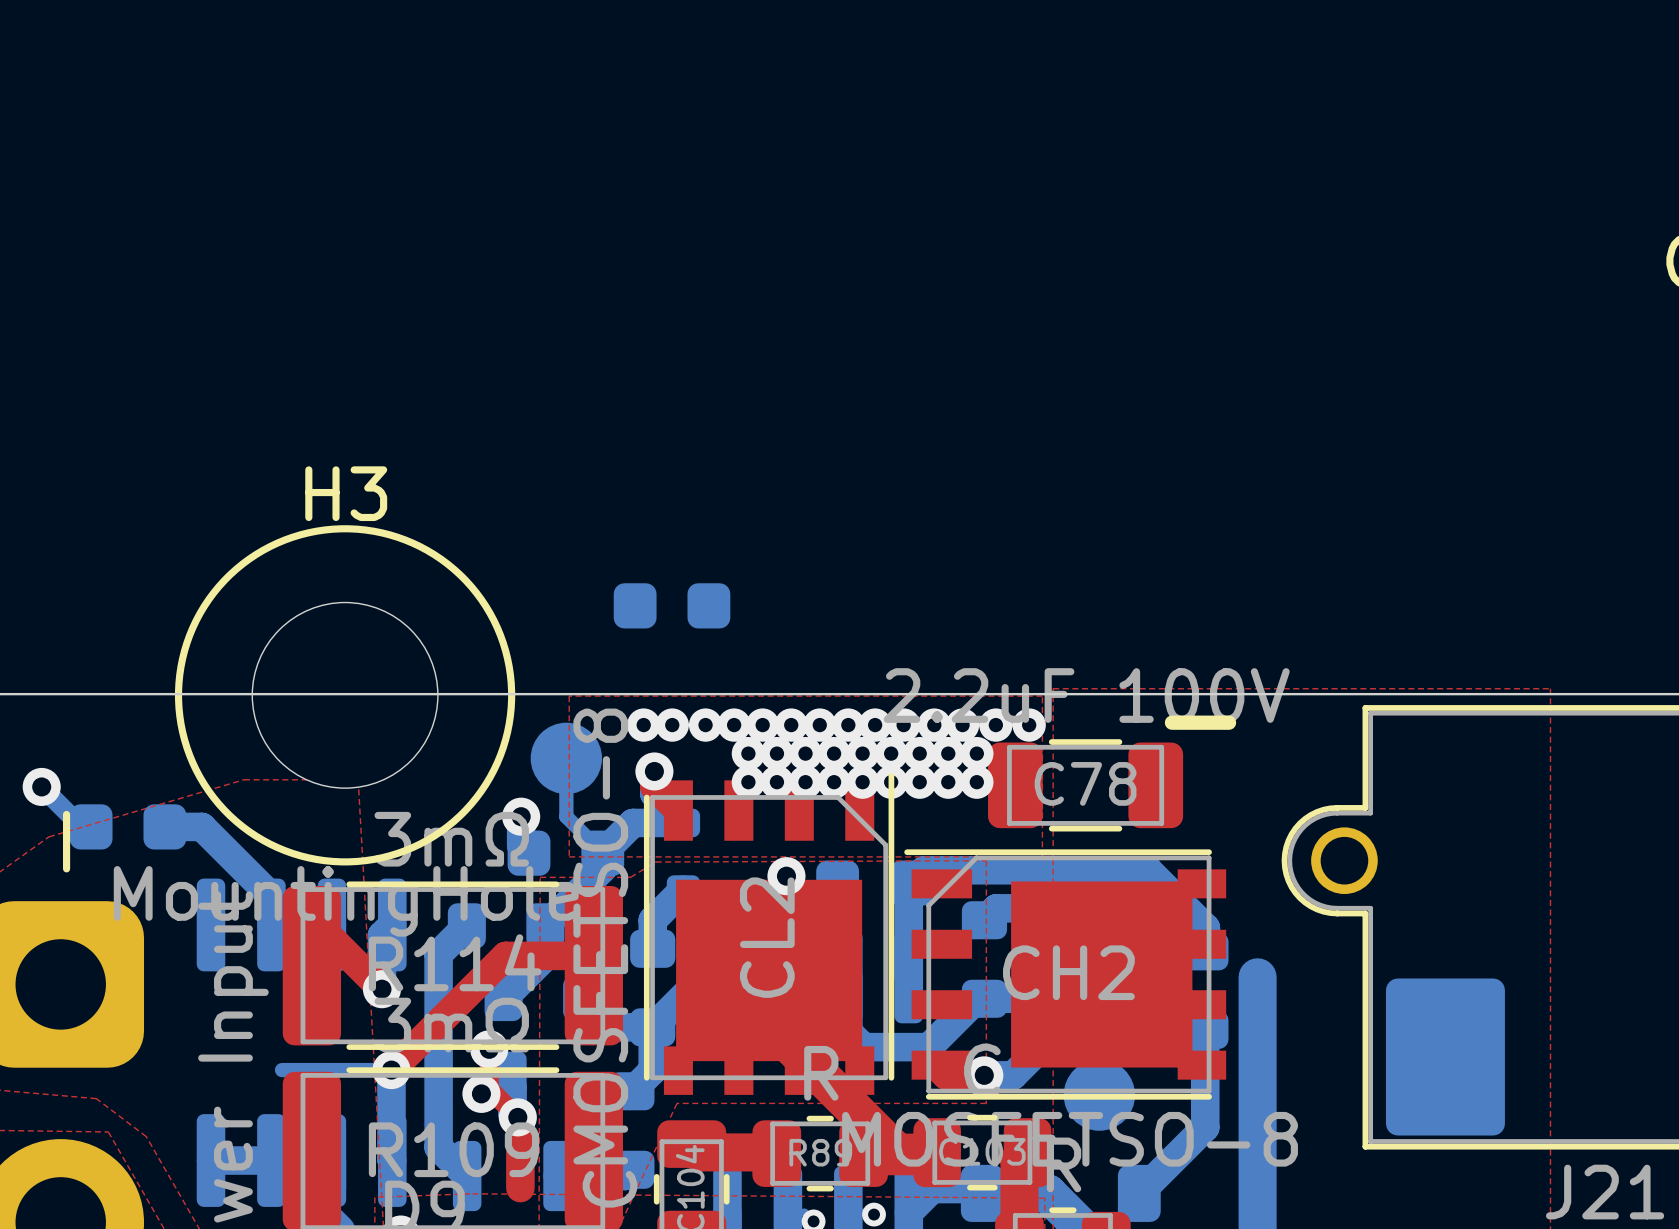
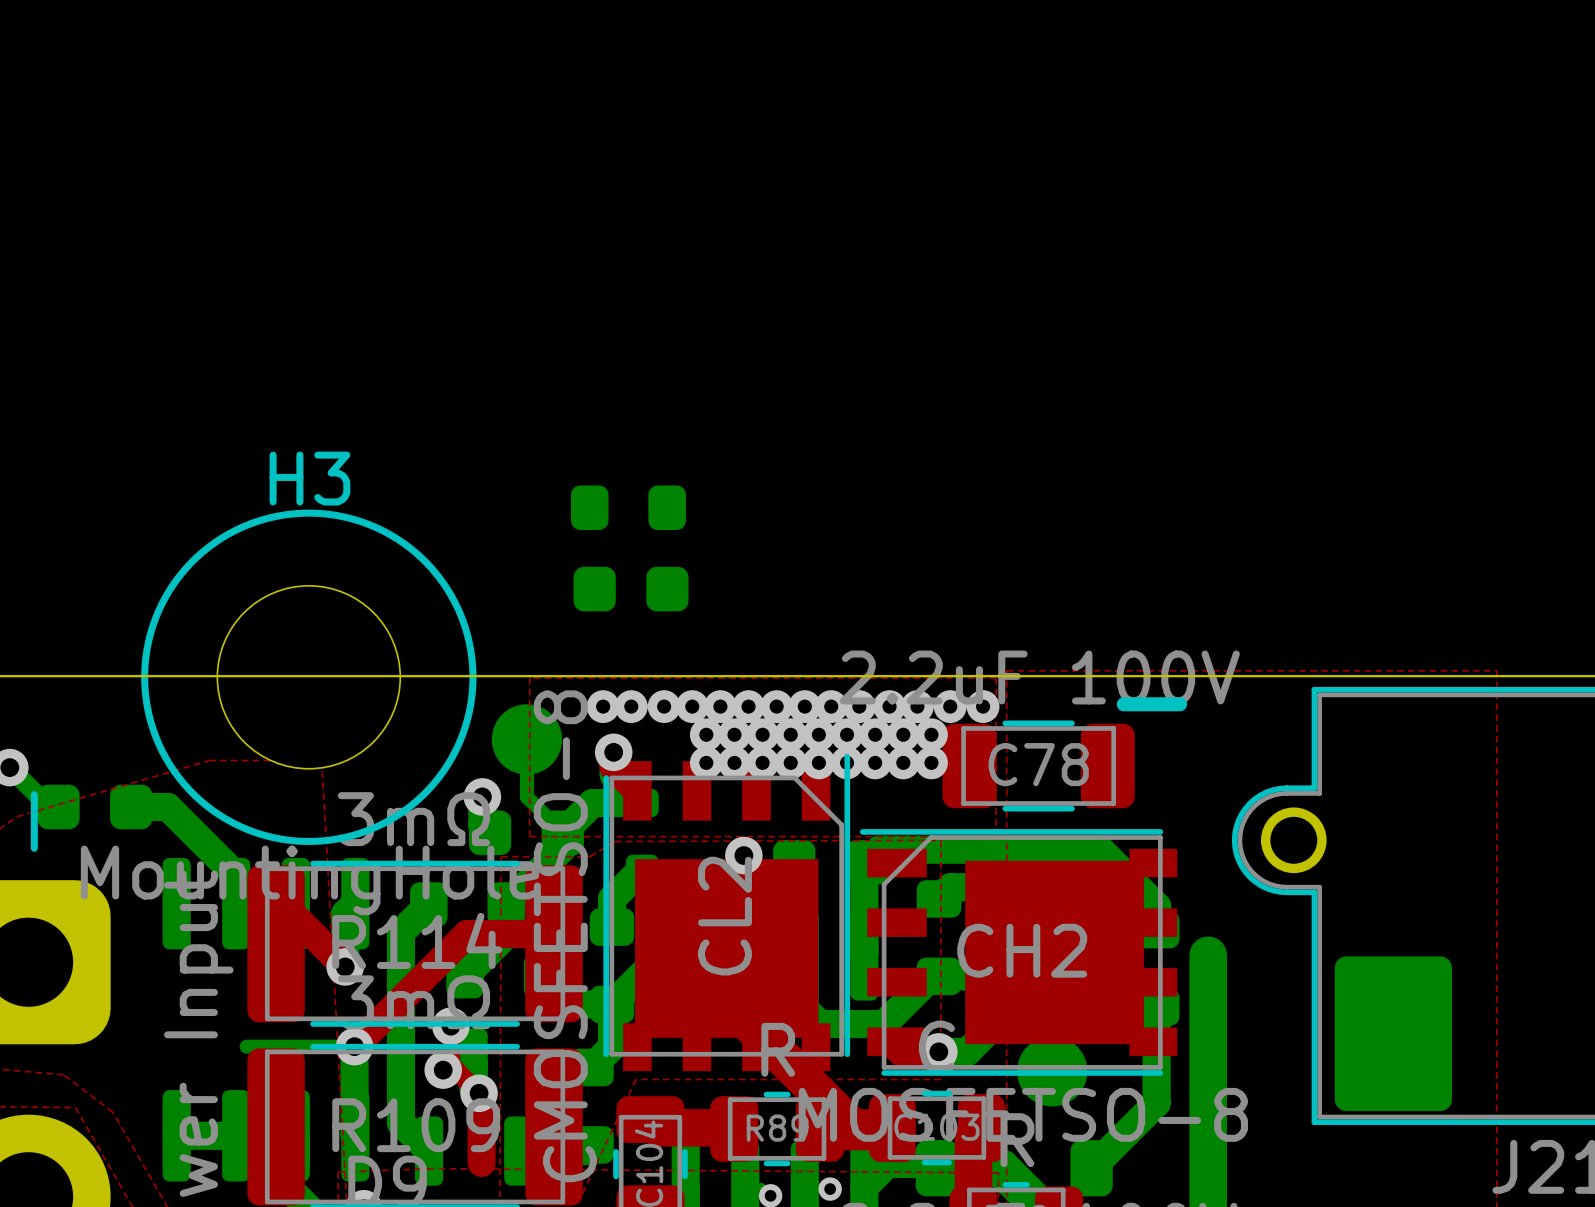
part: none -> (628, 507)

